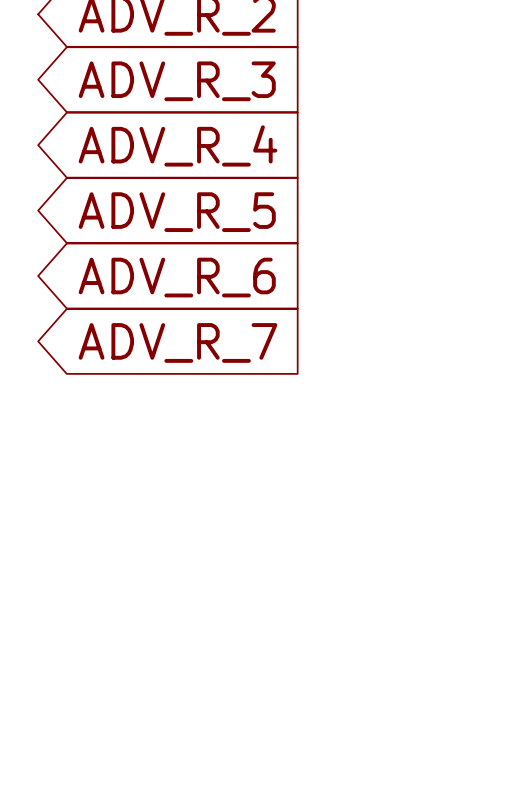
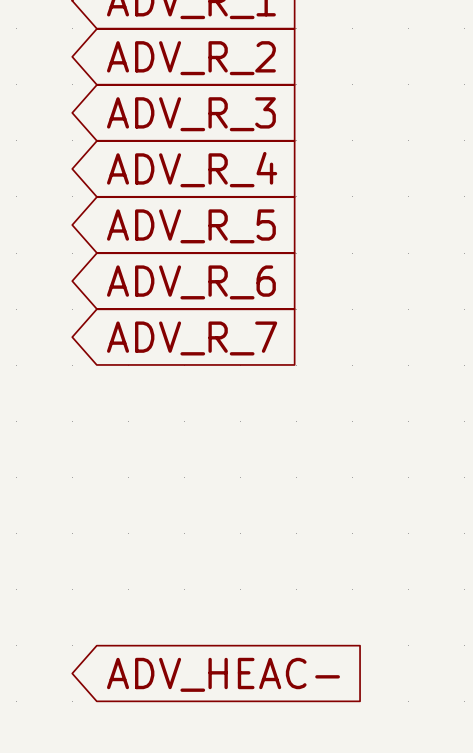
global label: none -> ADV_HEAC- (223, 674)

